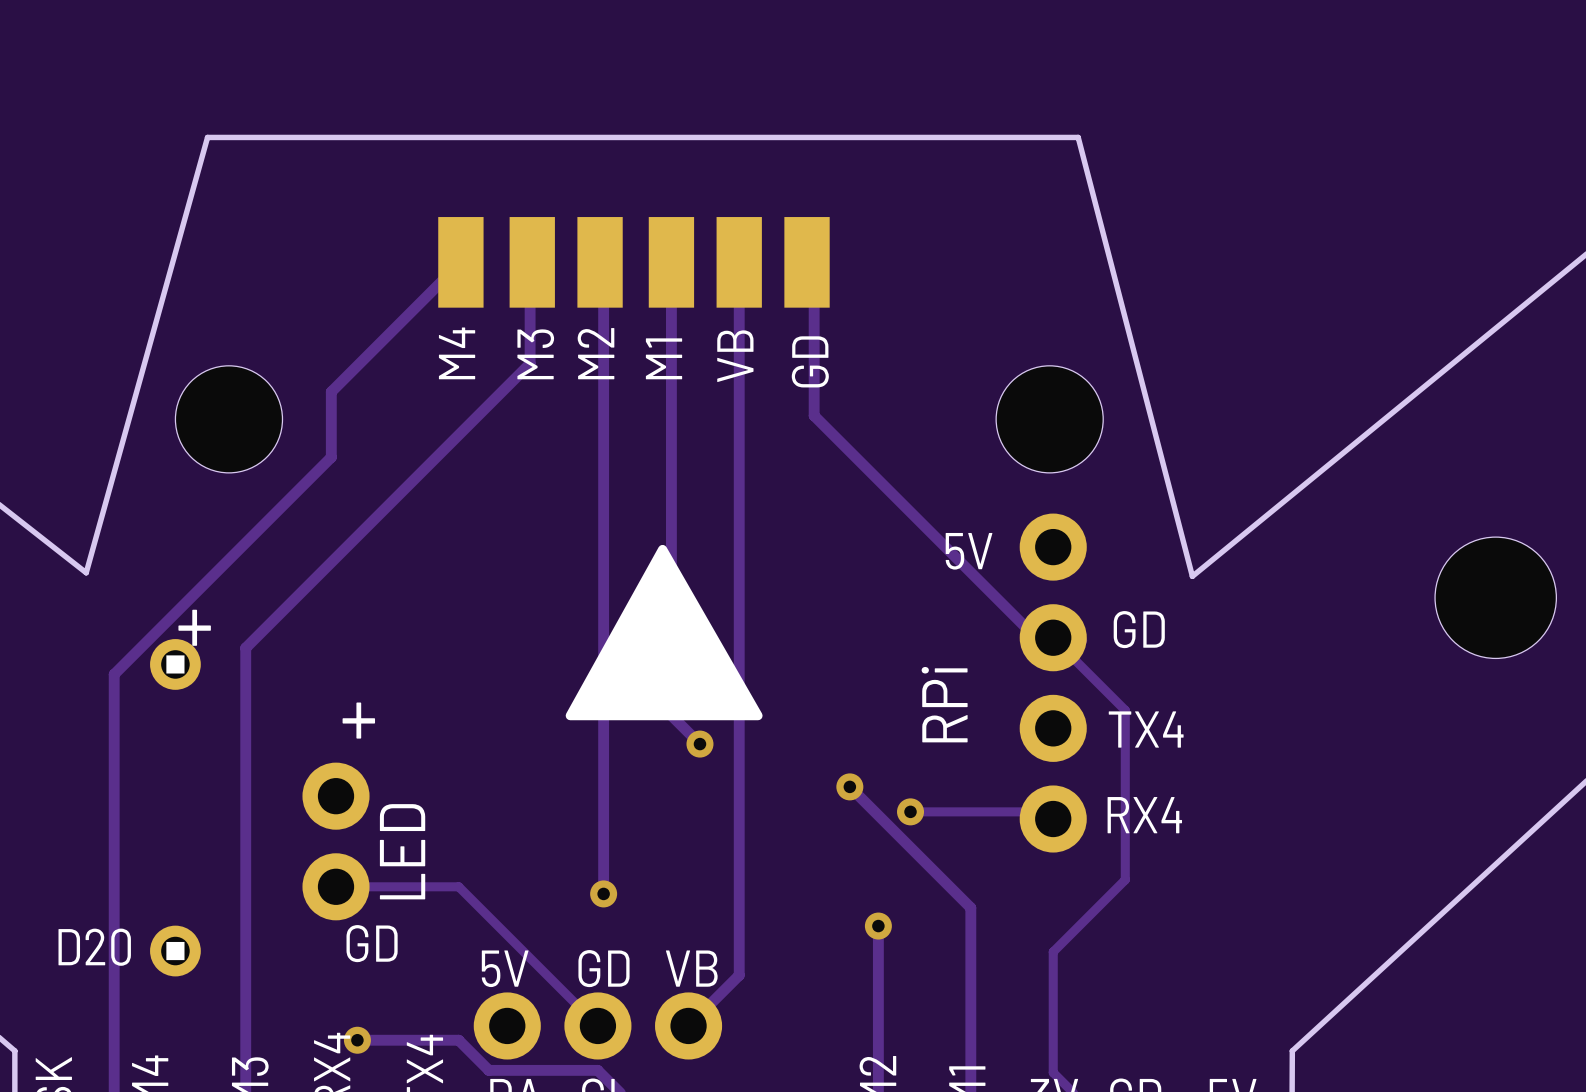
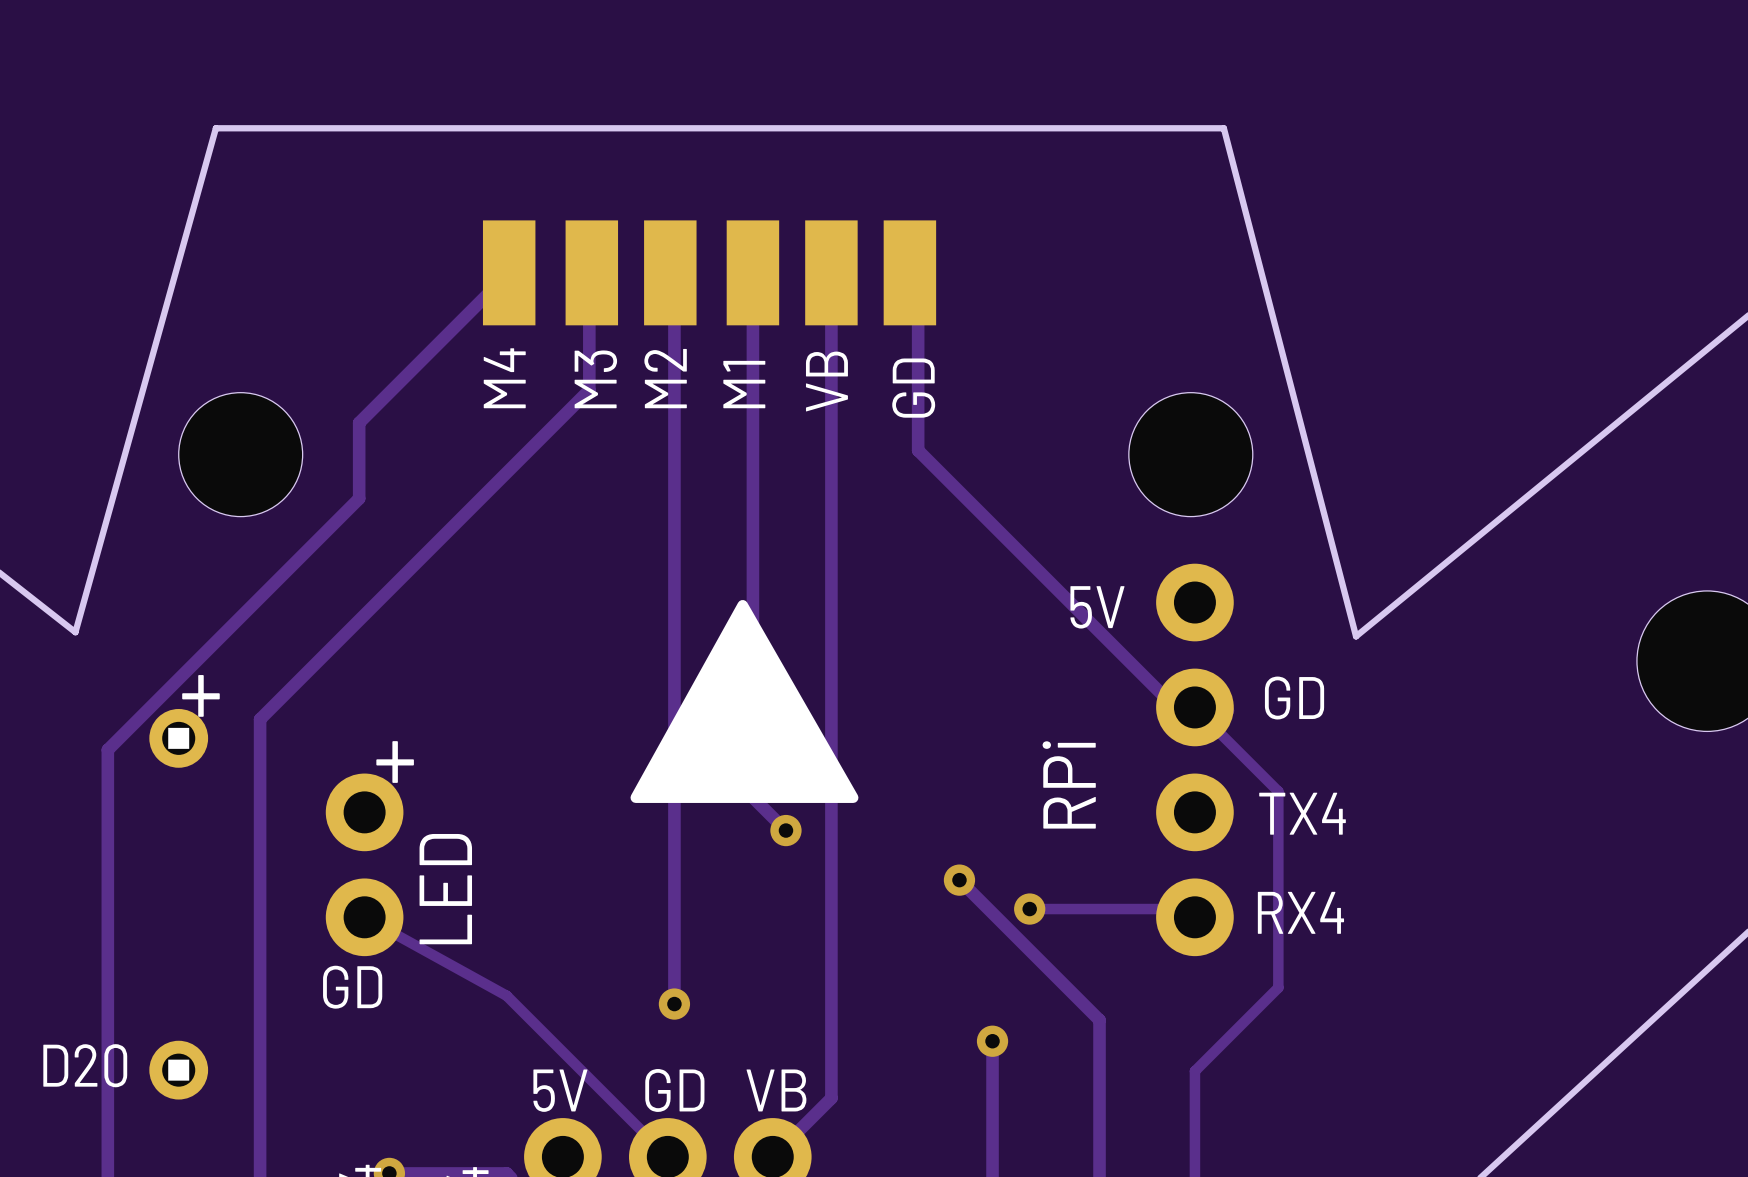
text position: + (358, 720) -> + (395, 762)
part position: (336, 841) -> (364, 864)
text position: LED (402, 851) -> LED (445, 889)
track: (336, 886) (458, 886) -> (364, 917) (506, 995)
text position: GD (372, 943) -> GD (352, 987)

